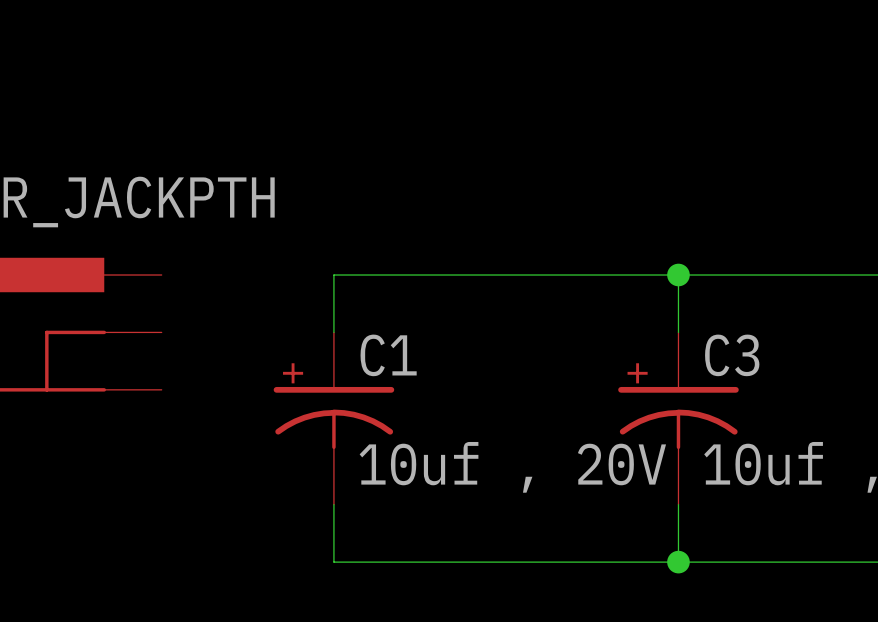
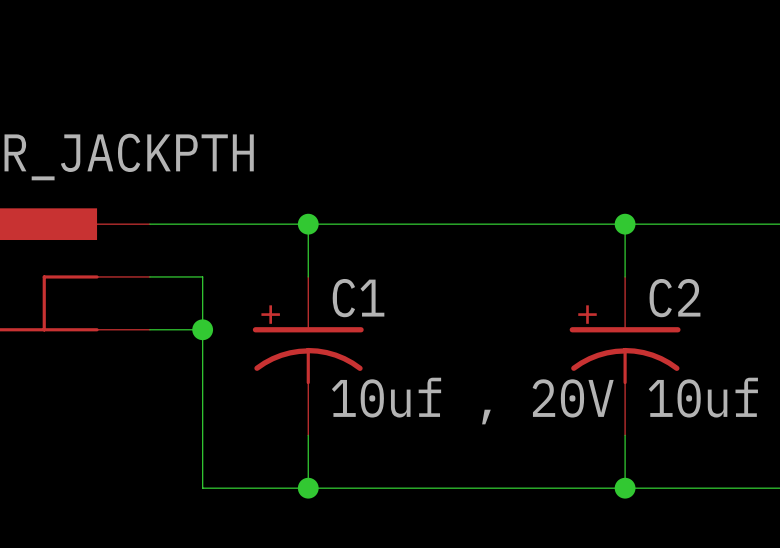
wire: none -> (149, 224) (308, 224)
junction: none -> (308, 224)
wire: none -> (149, 276) (202, 276) (202, 488) (308, 488)
C3 name: C3 (732, 355) -> C2 (674, 298)
wire: none -> (149, 329) (202, 329)
junction: none -> (202, 329)
junction: none -> (308, 488)

